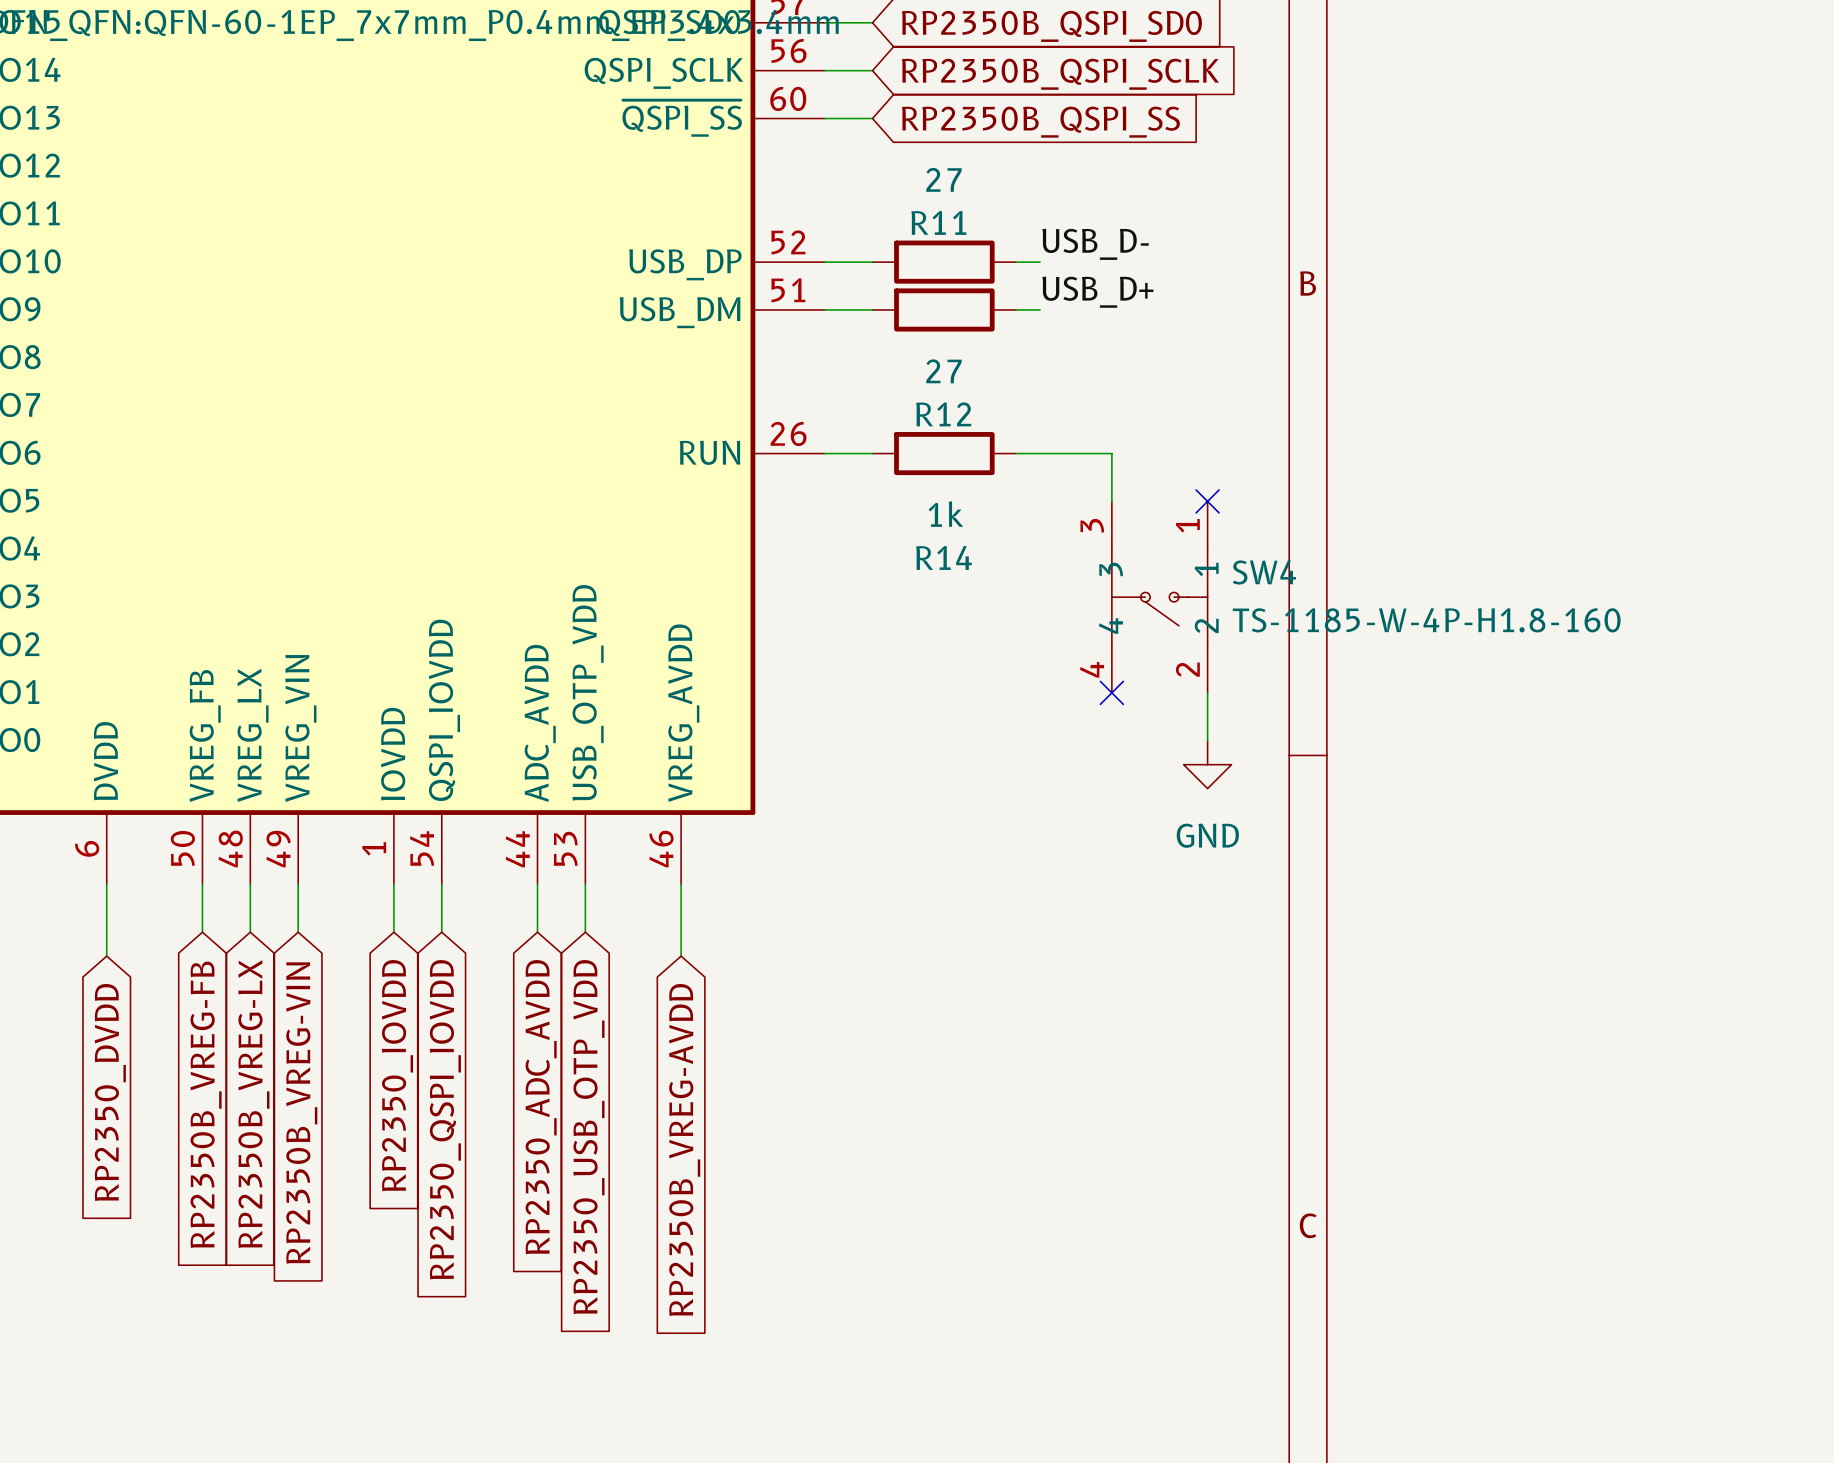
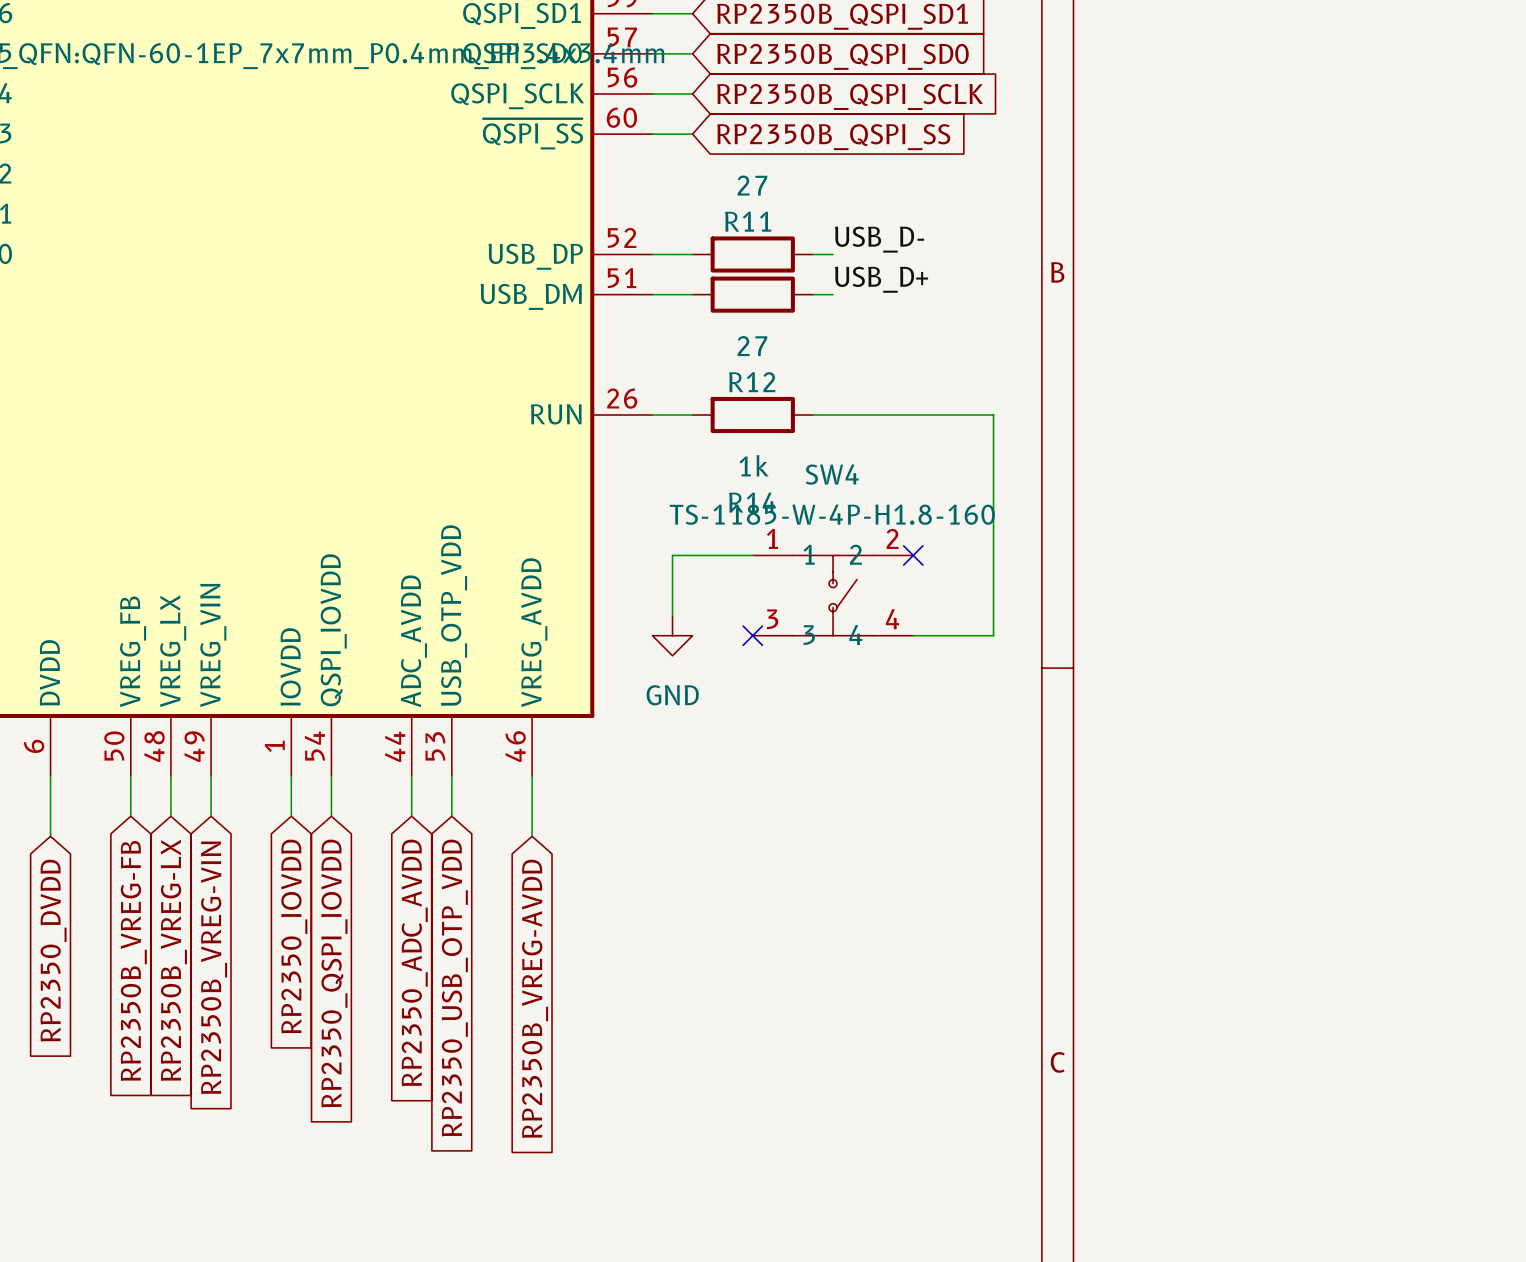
wire: (1111, 453) (1111, 501) -> (893, 415) (993, 415) (993, 635) (913, 635)
no-connect mark: (1207, 501) -> none
SW4 rotation: 0° (1159, 597) -> 90° counterclockwise (833, 595)
SW4 position: (1159, 597) -> (833, 595)
SW4 value position: TS-1185-W-4P-H1.8-160 (1426, 620) -> TS-1185-W-4P-H1.8-160 (832, 514)
wire: none -> (752, 555) (672, 555) (672, 615)
no-connect mark: none -> (913, 555)
no-connect mark: (1111, 692) -> none
wire: (1207, 692) (1207, 740) -> none
no-connect mark: none -> (752, 635)
power symbol position: GND (1207, 764) -> GND (672, 635)

